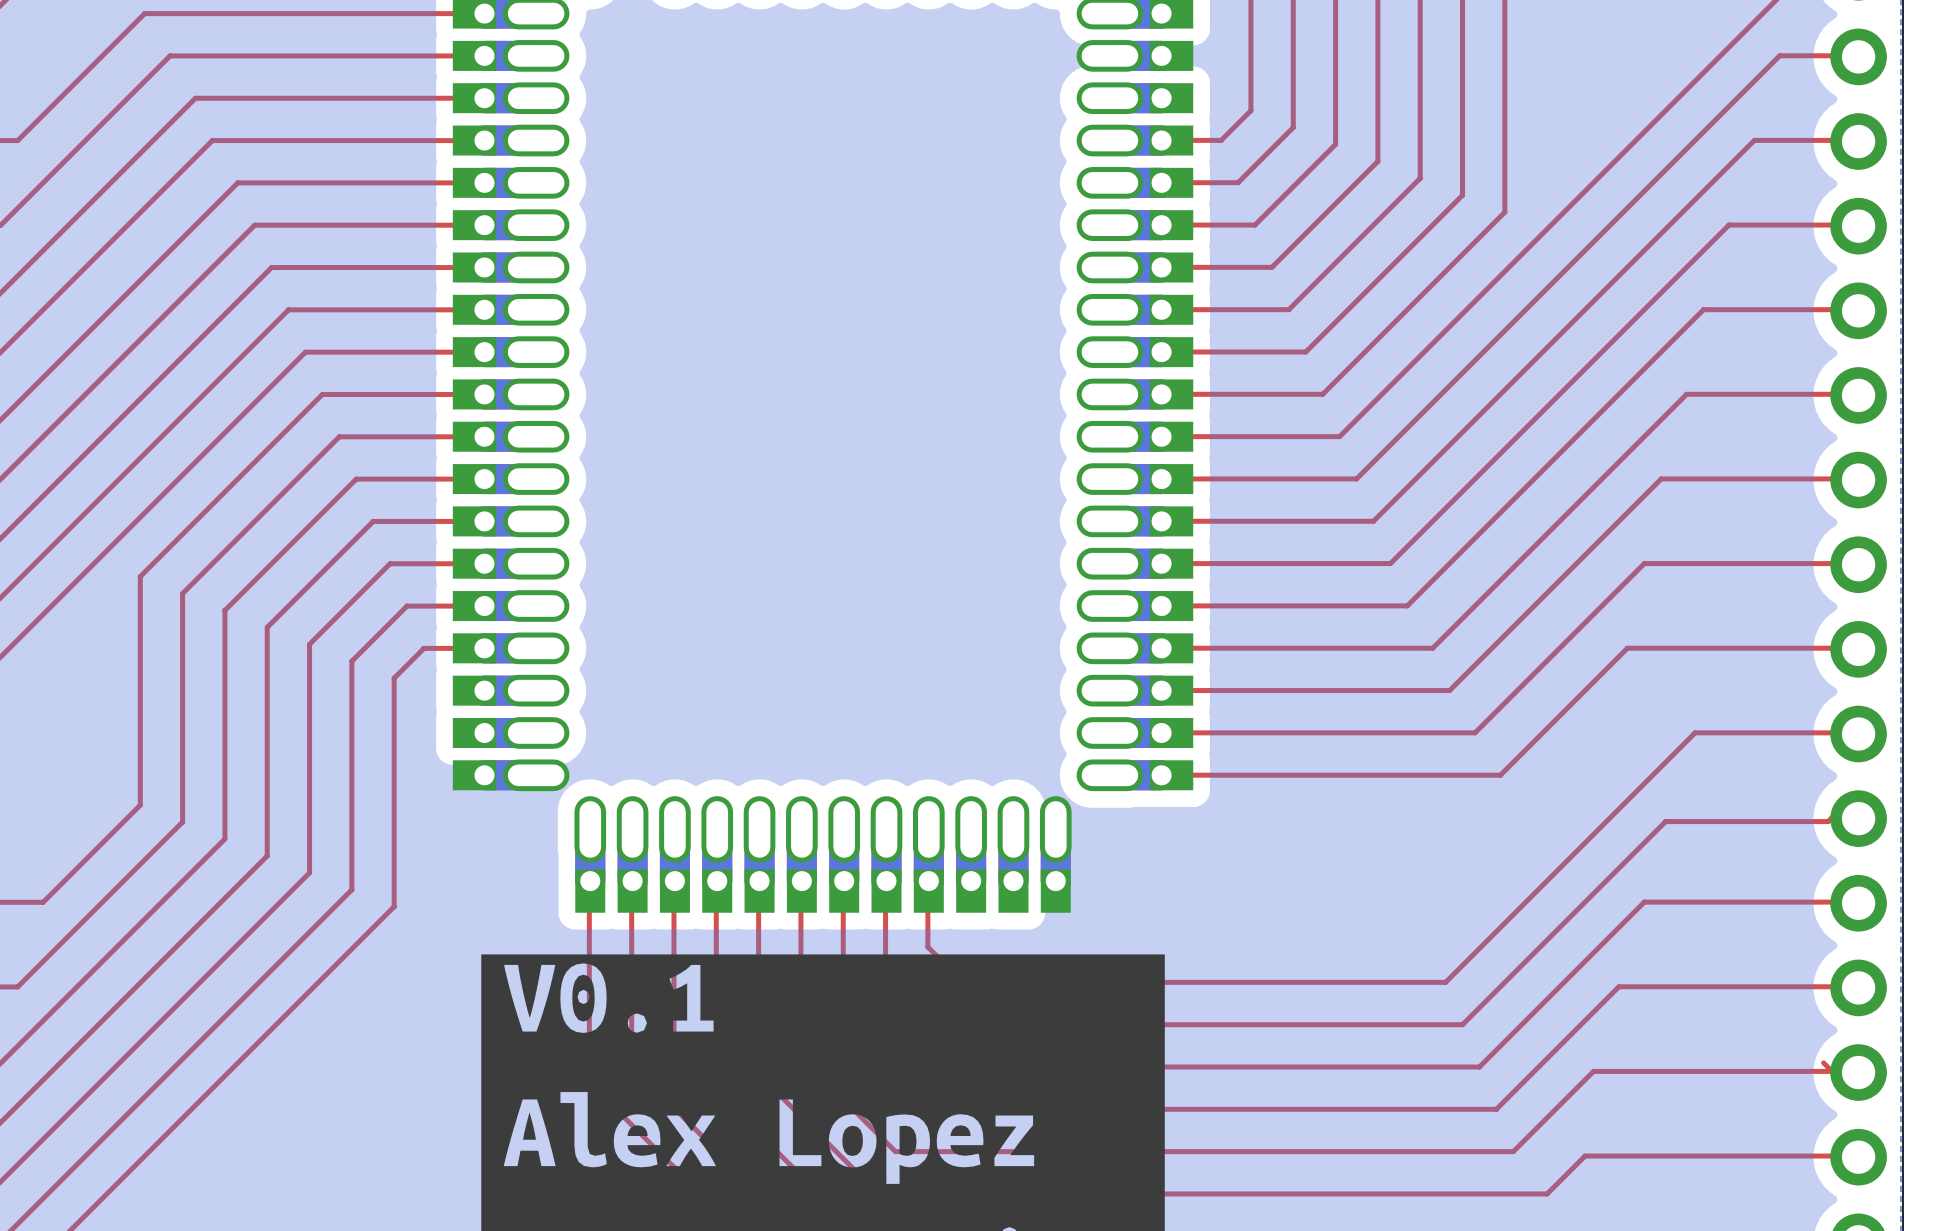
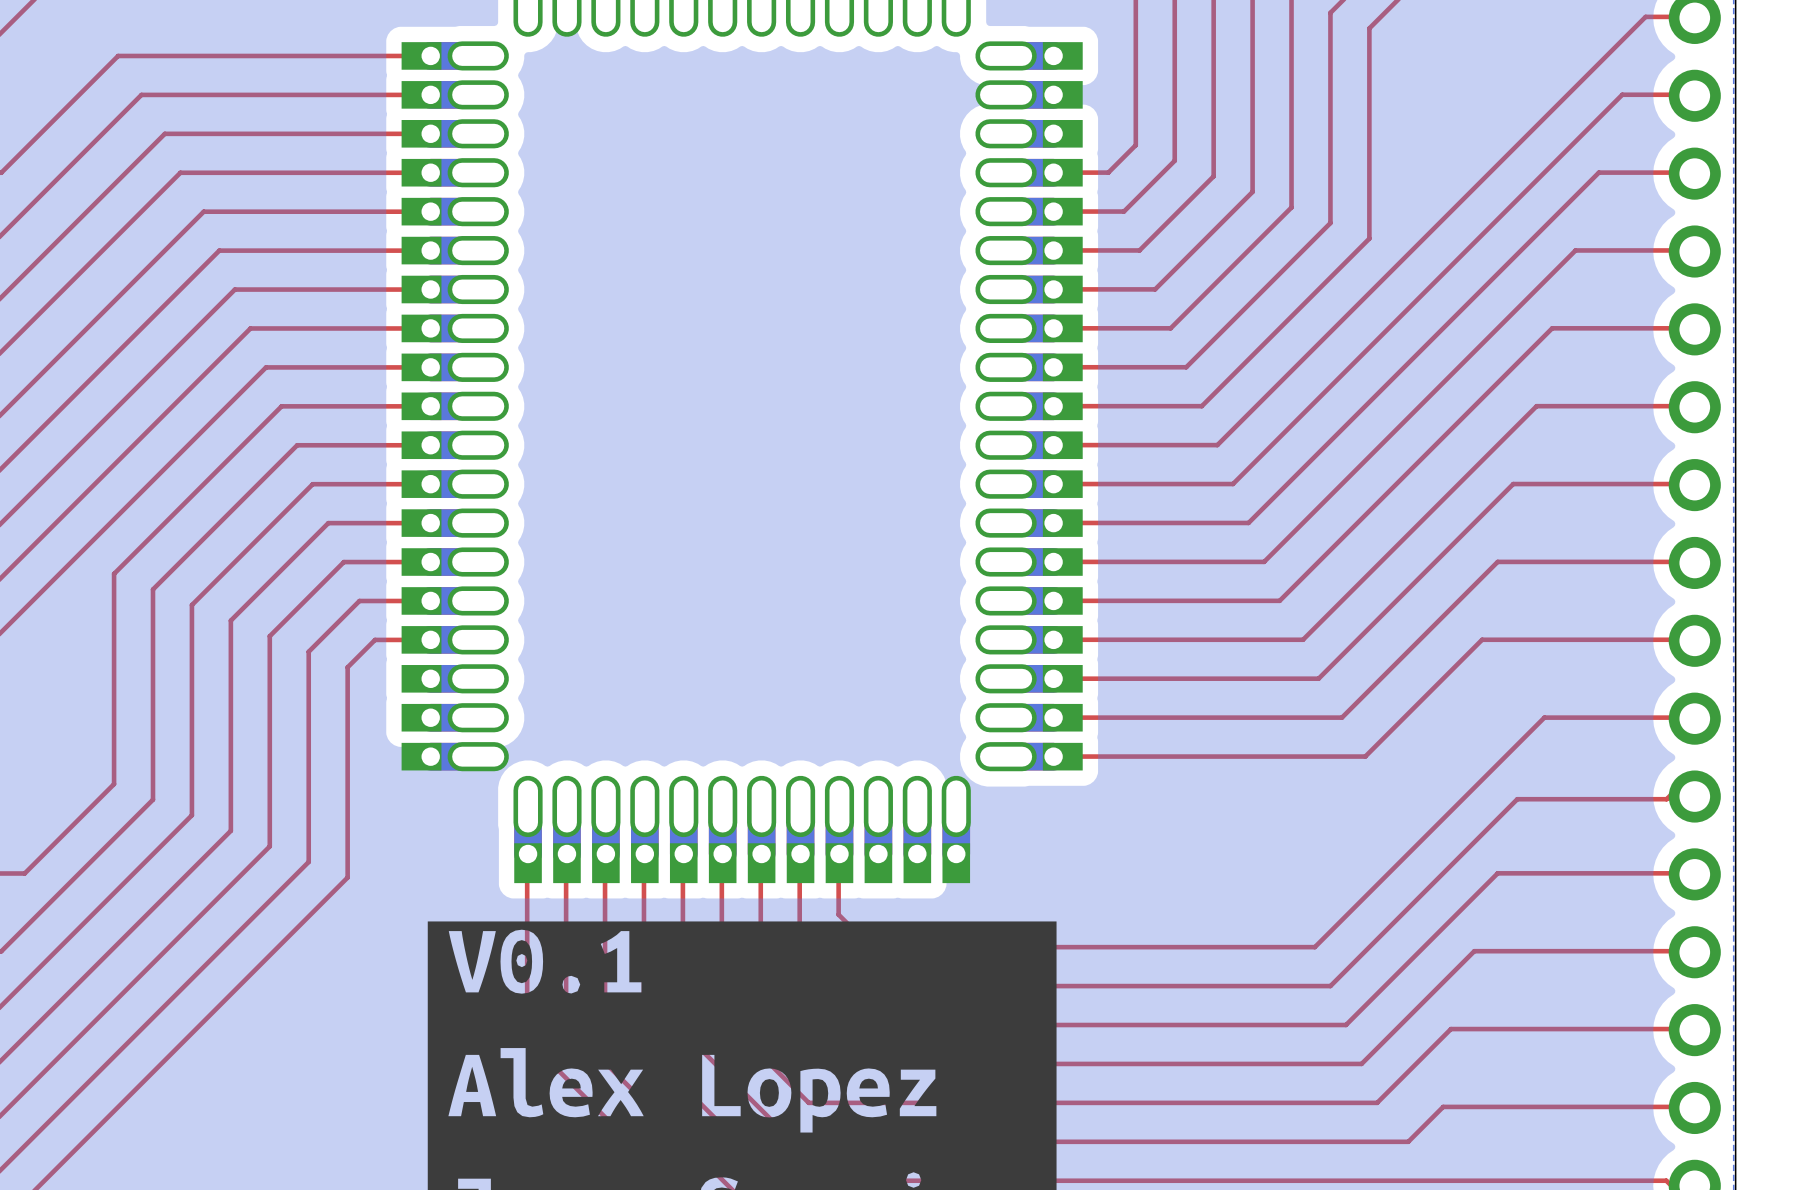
top track: (1823, 1062) (1832, 1071) -> none

